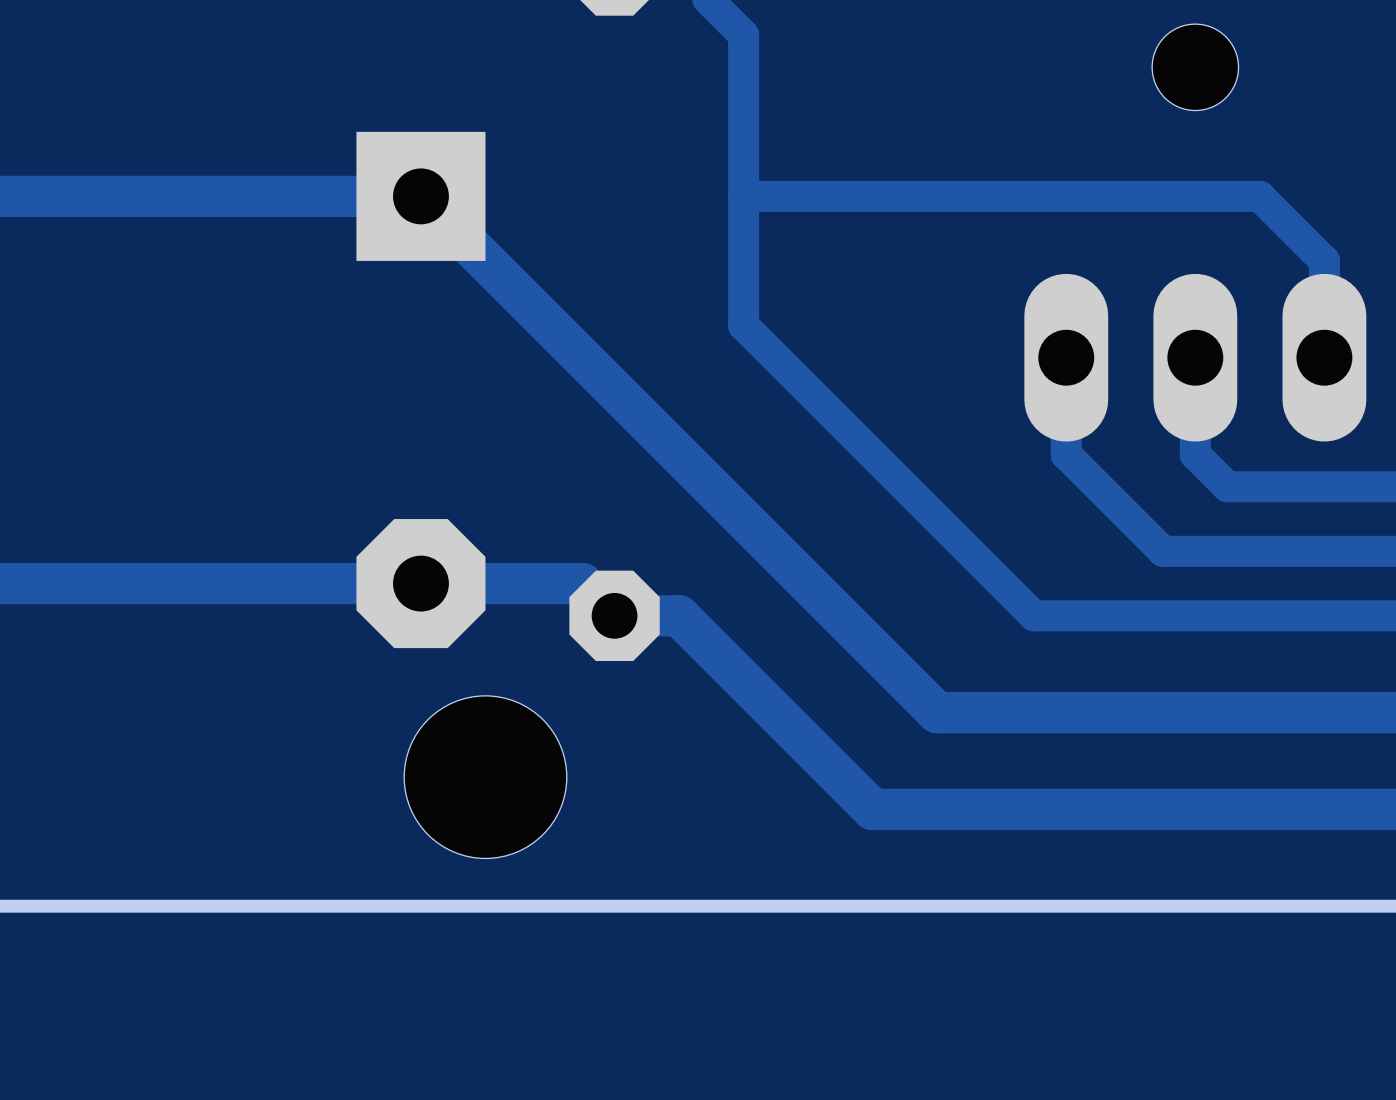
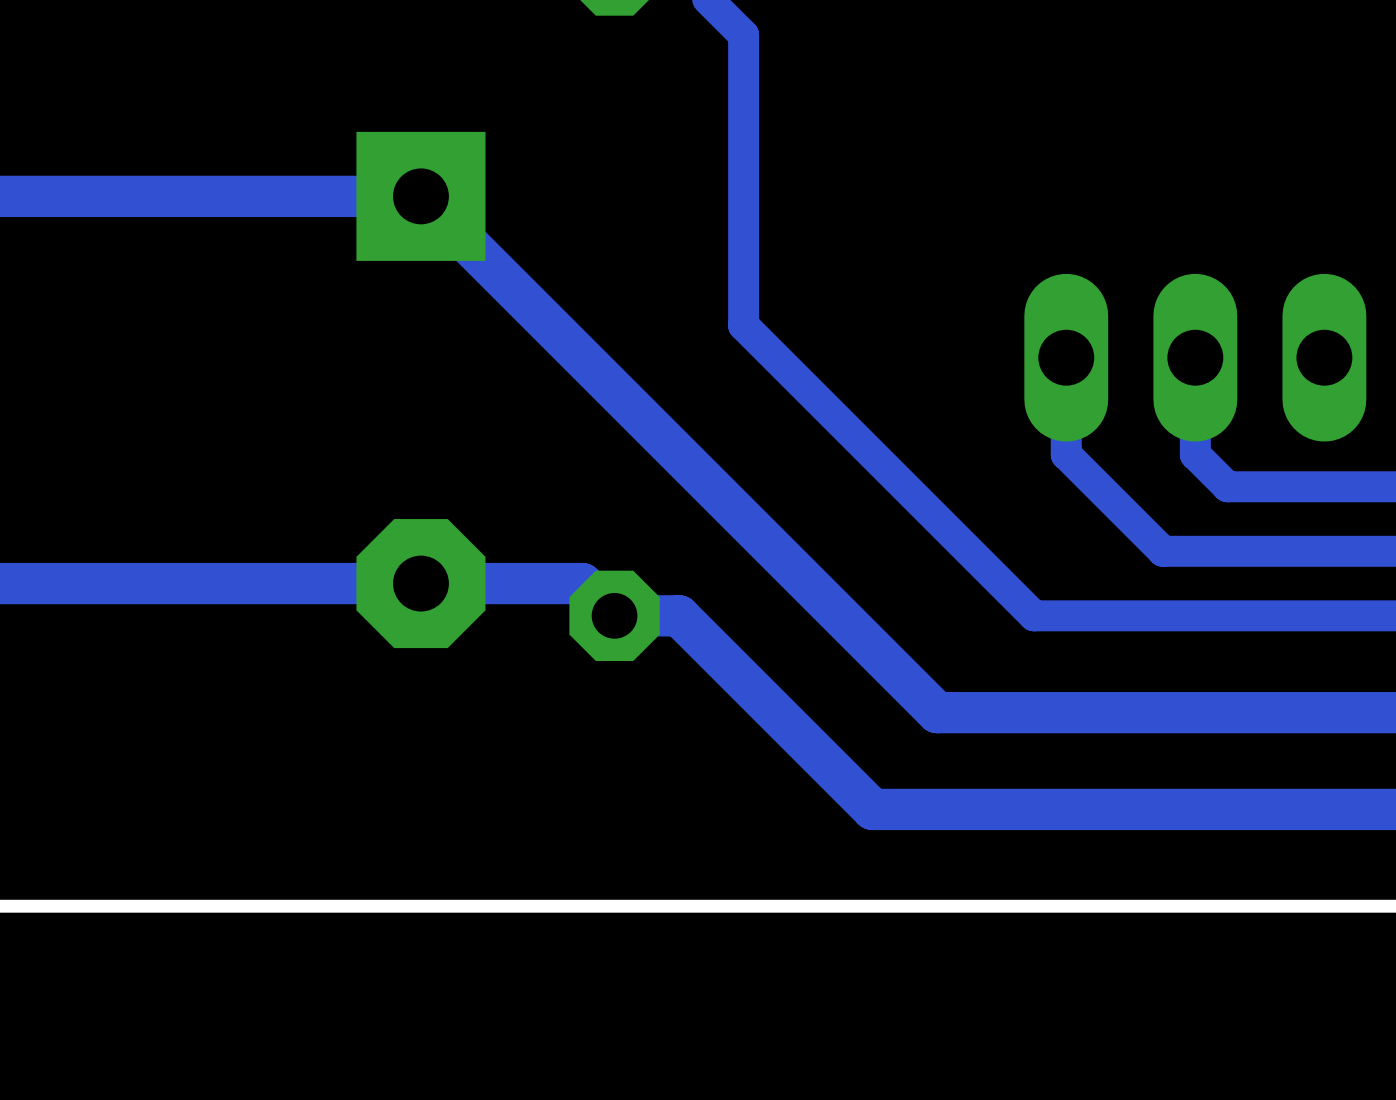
part: (1195, 67) -> none
track: (743, 196) (1259, 196) (1324, 260) (1324, 357) -> none
hole: (485, 777) -> none

